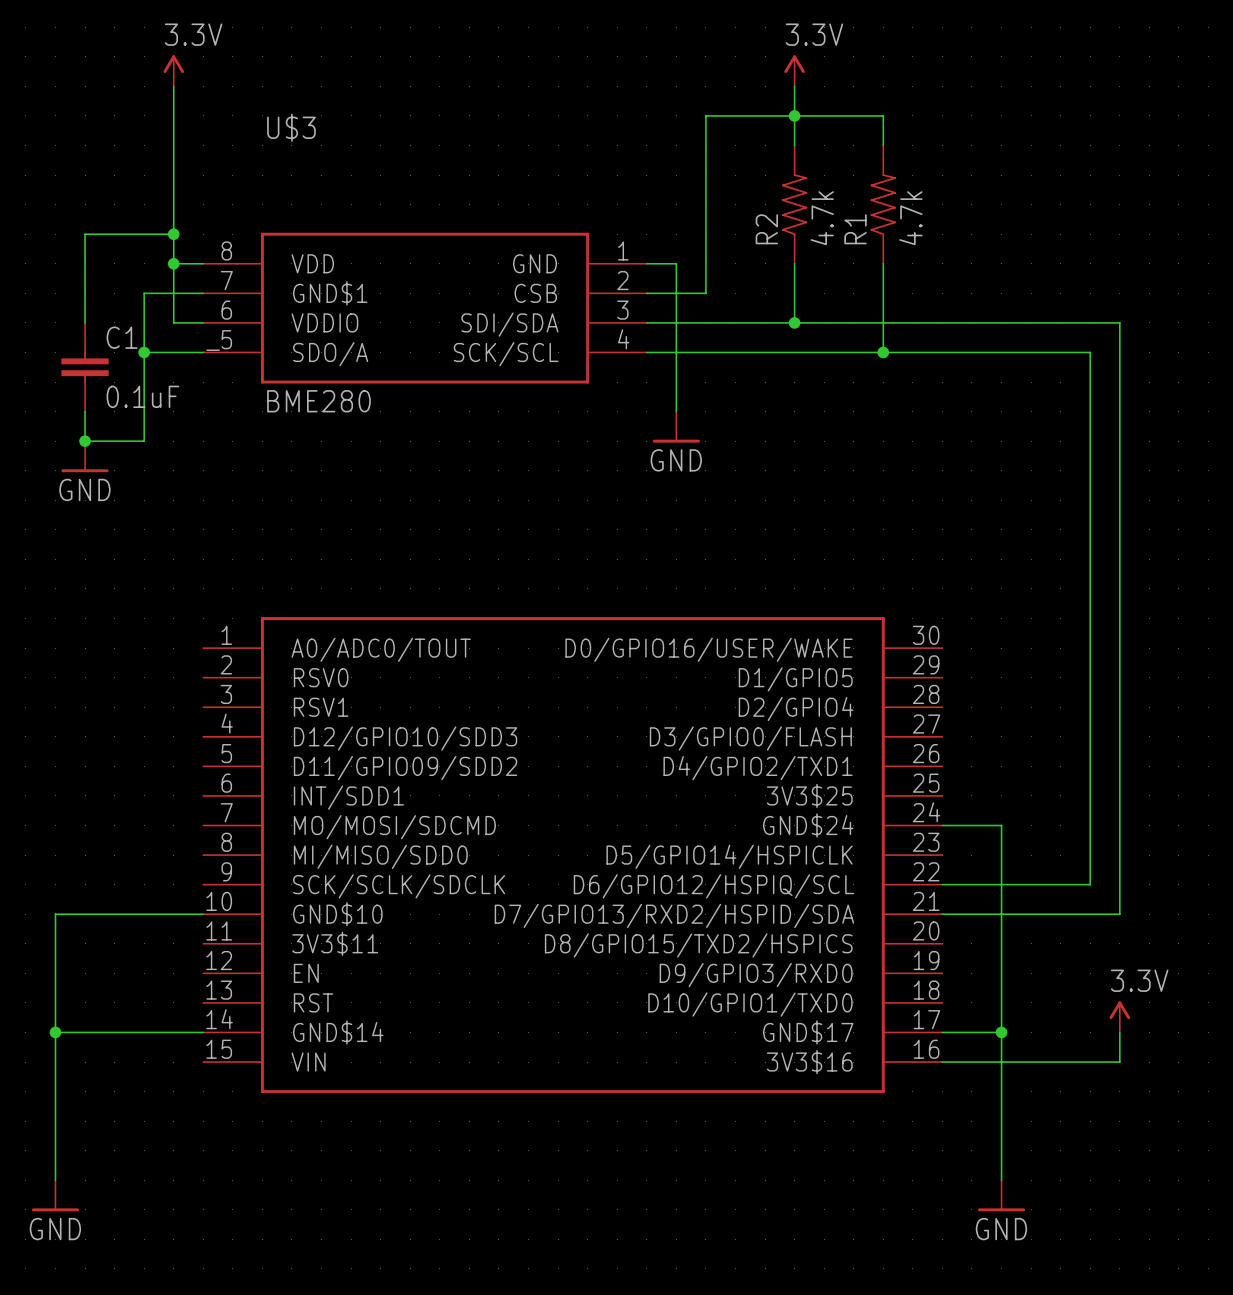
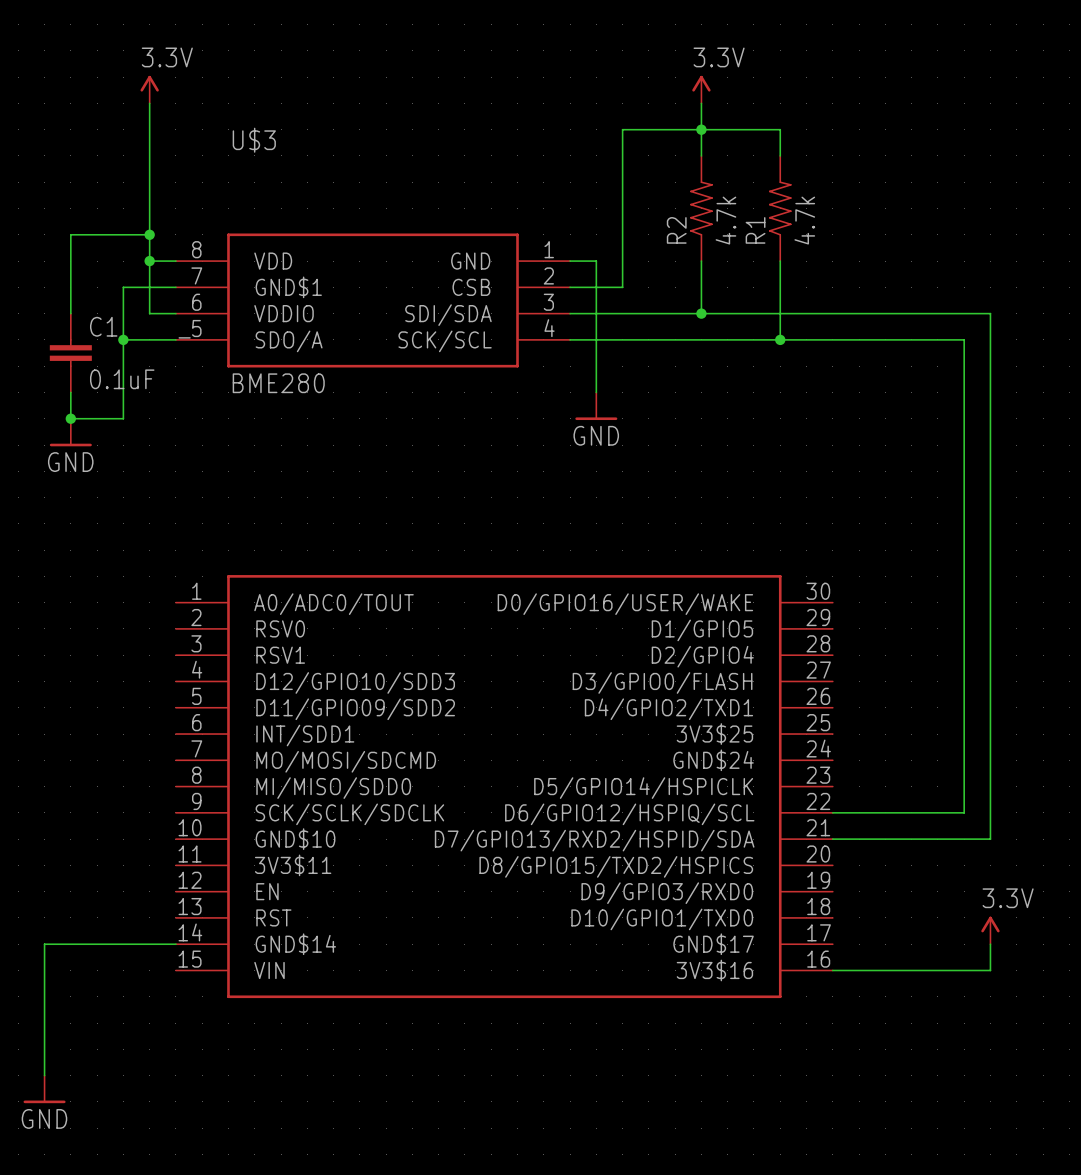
wire: (942, 825) (1001, 825) (1001, 1180) -> none
wire: (203, 914) (55, 914) (55, 1032) -> none
junction: (55, 1032) -> none
wire: (942, 1032) (1001, 1032) -> none
junction: (1001, 1032) -> none
power symbol: GND (1001, 1195) -> none

